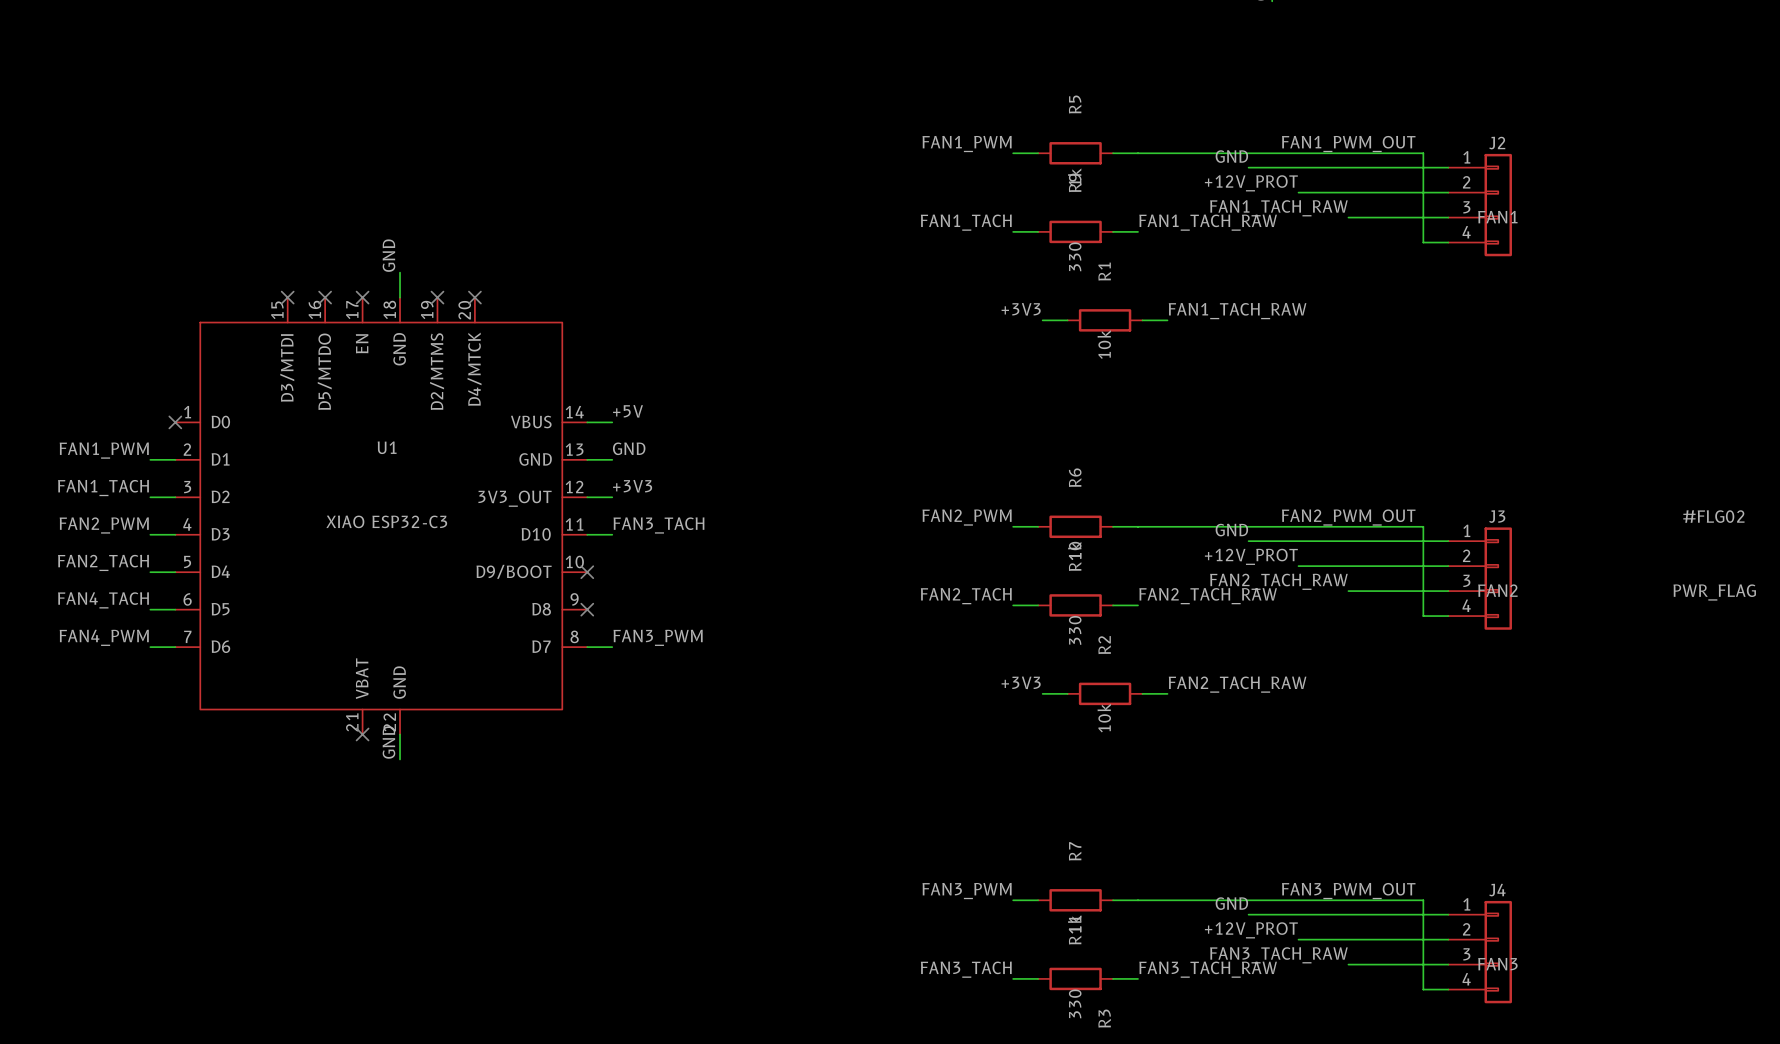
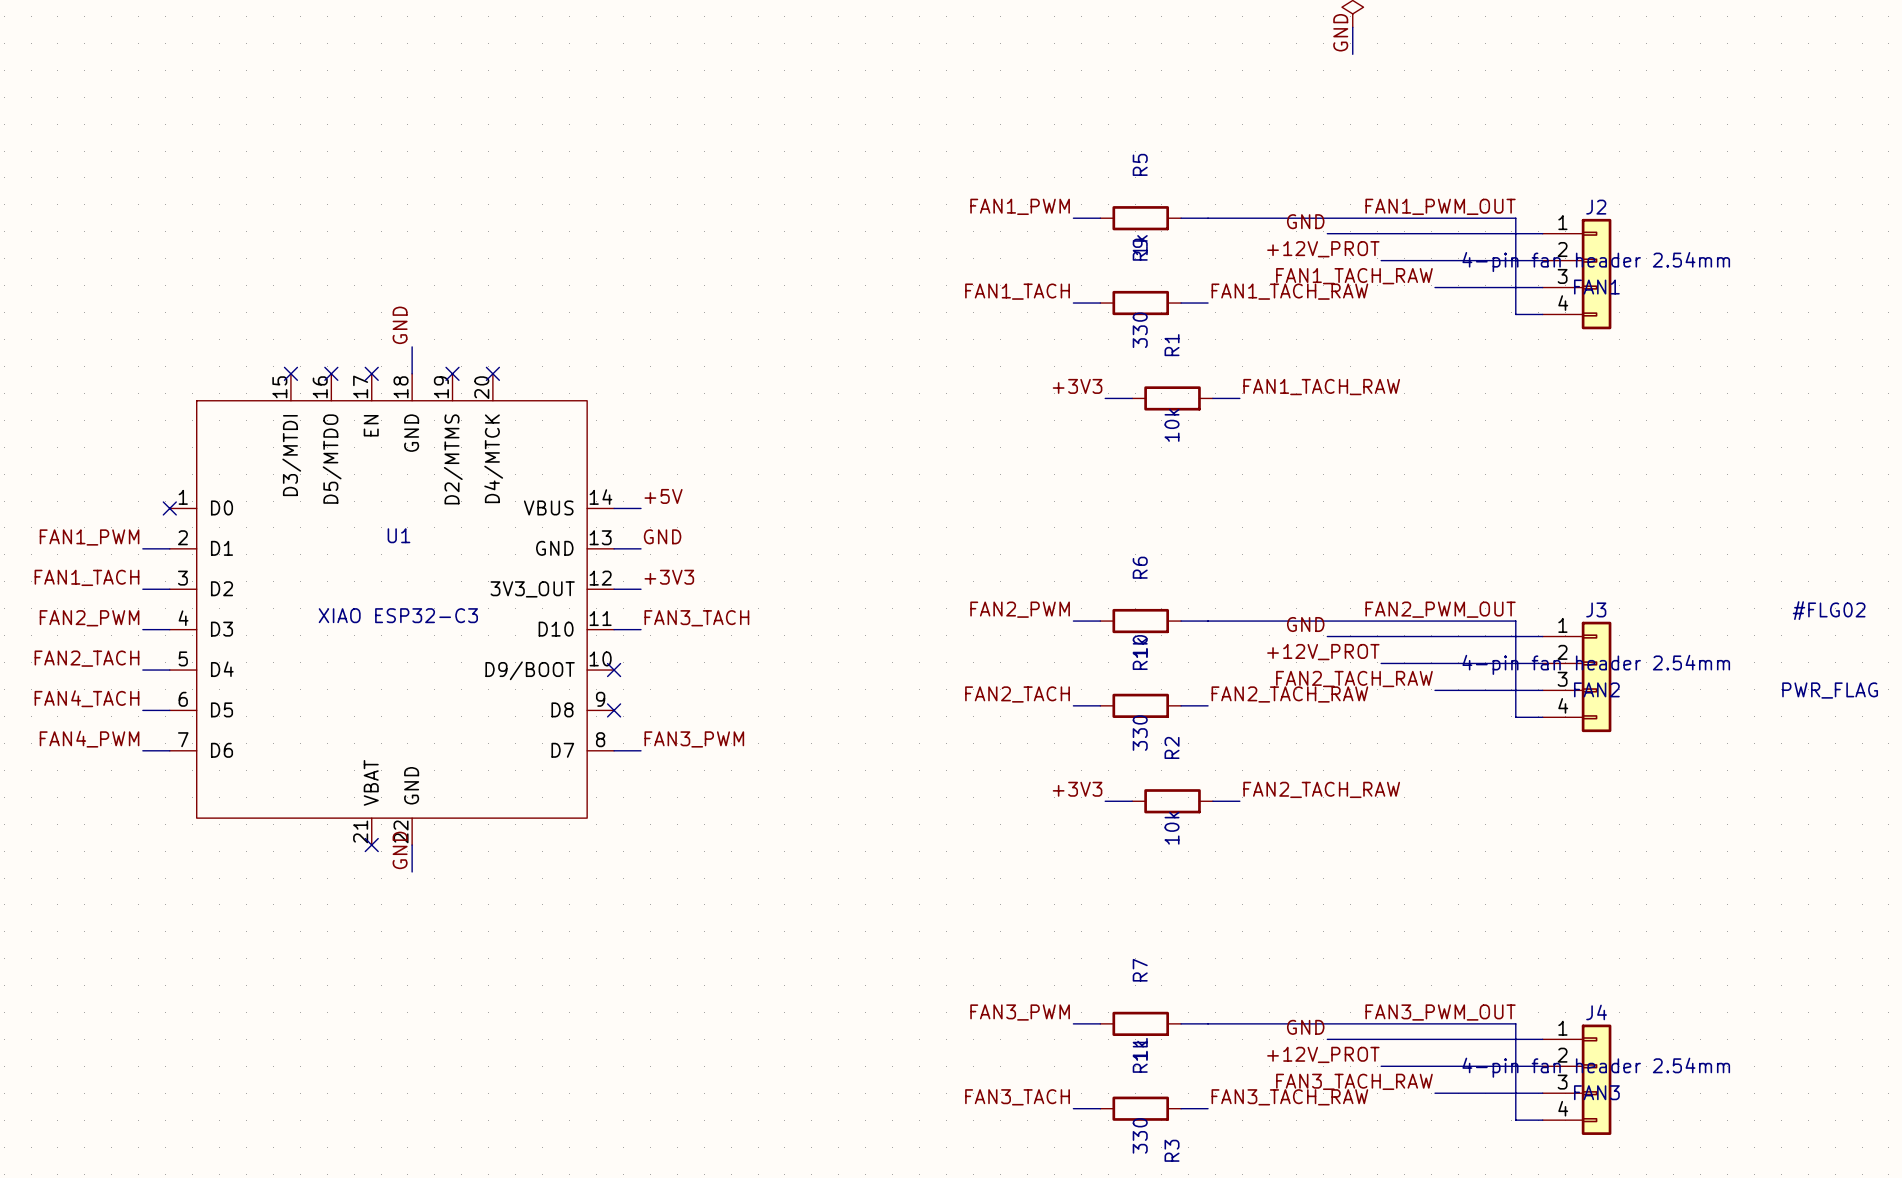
J2 text: none -> 4-pin fan header 2.54mm (1596, 262)
J3 text: none -> 4-pin fan header 2.54mm (1596, 664)
J4 text: none -> 4-pin fan header 2.54mm (1596, 1067)

